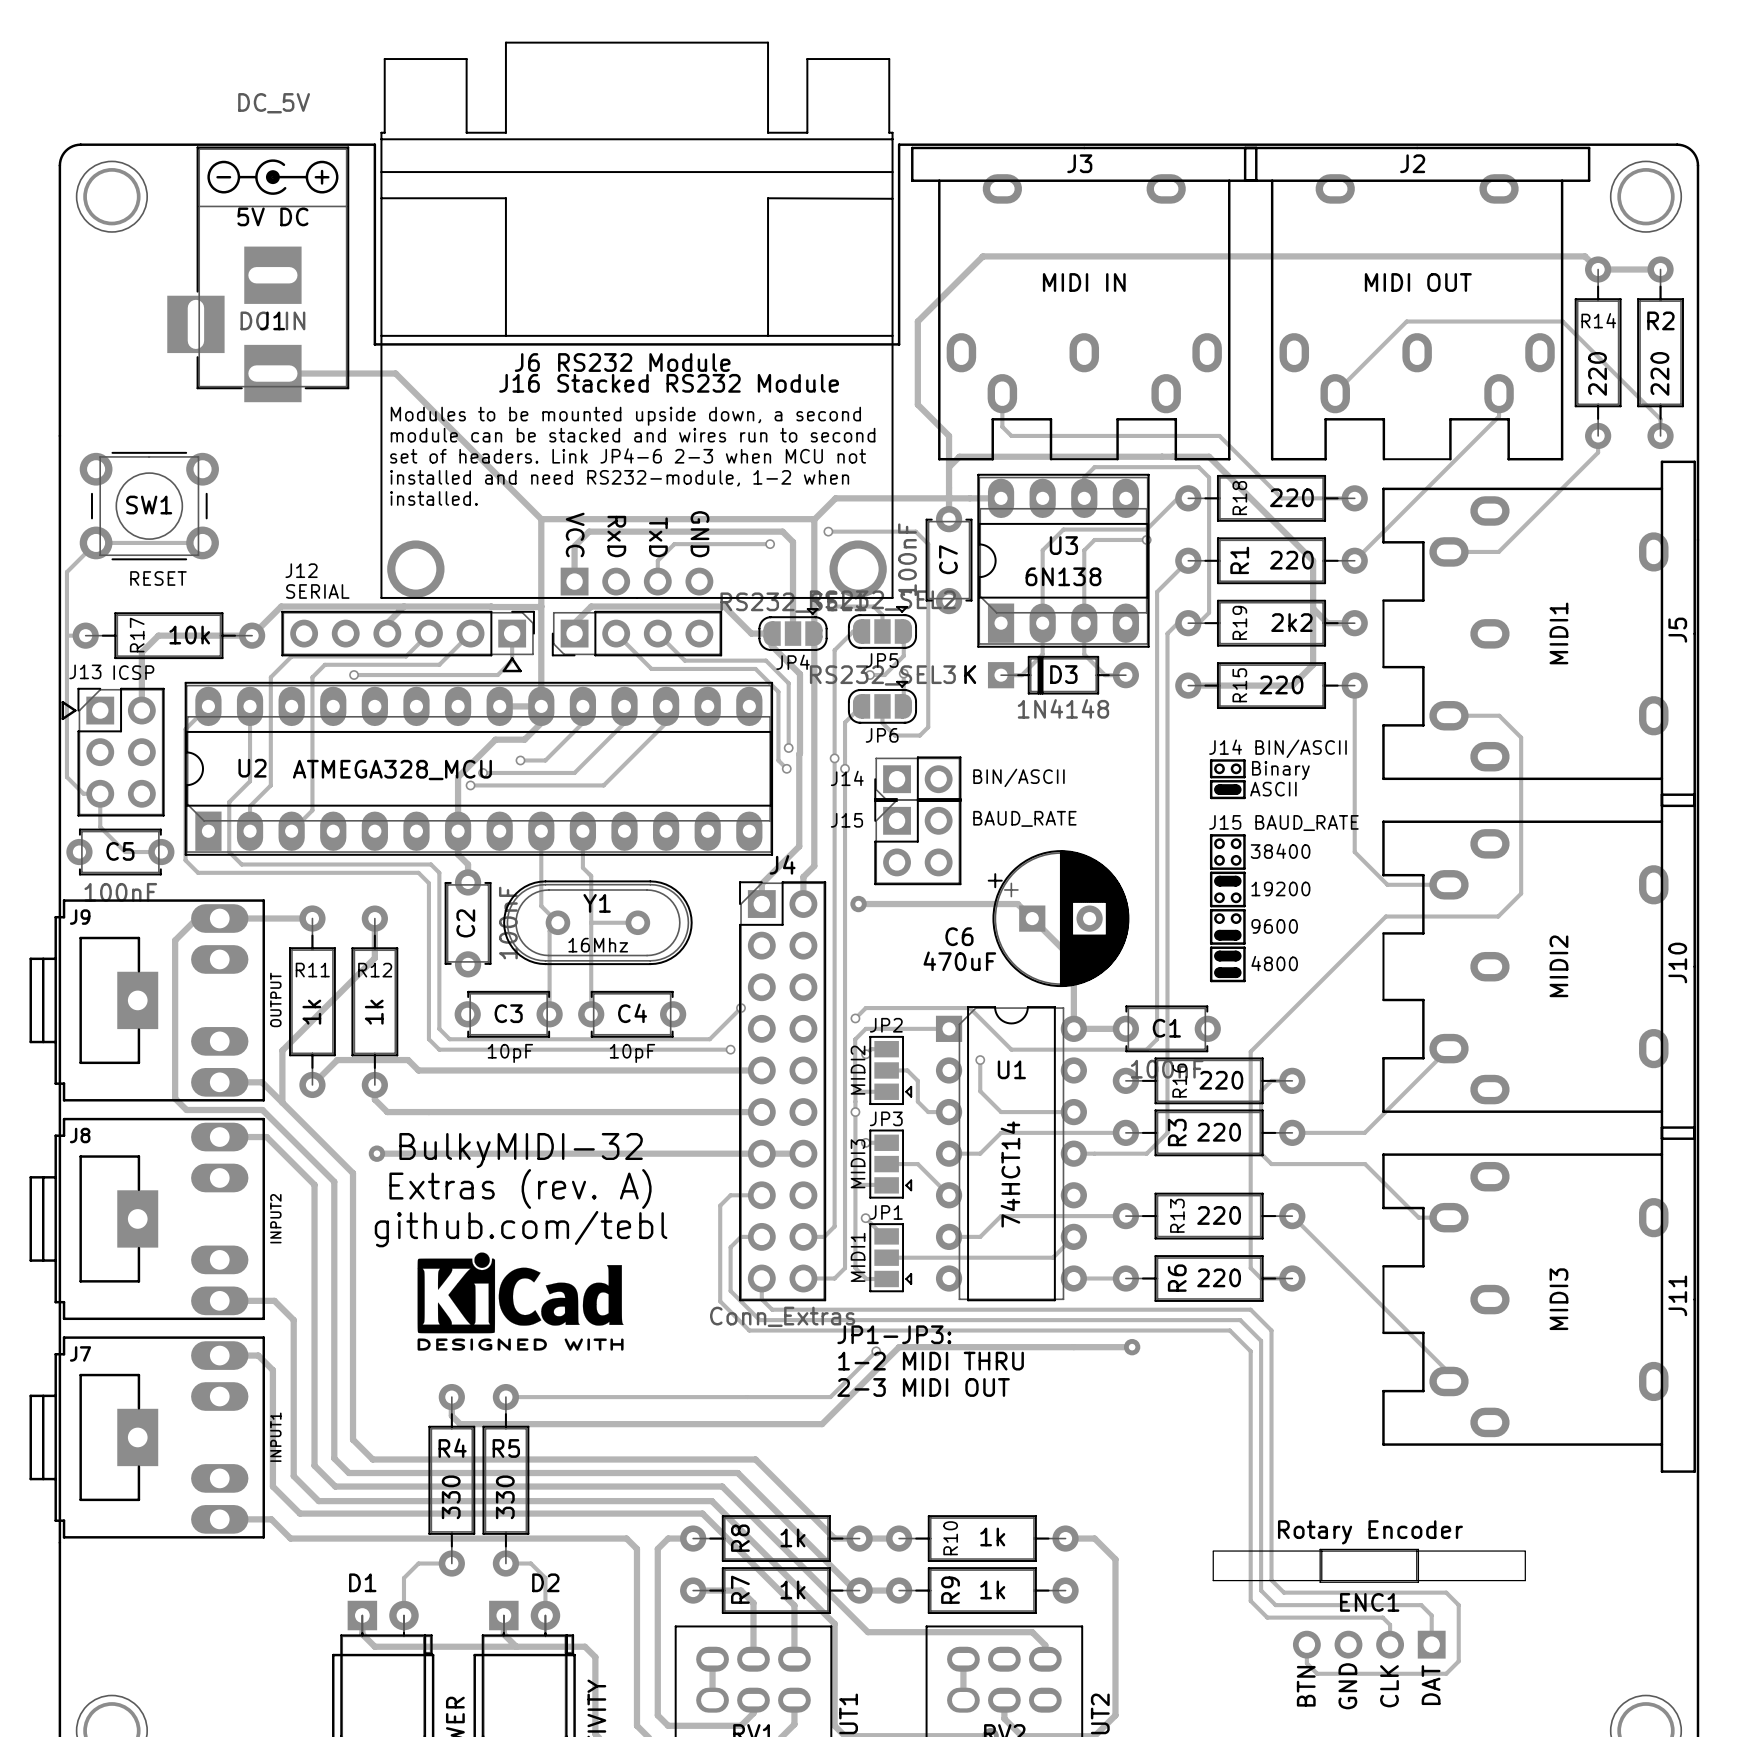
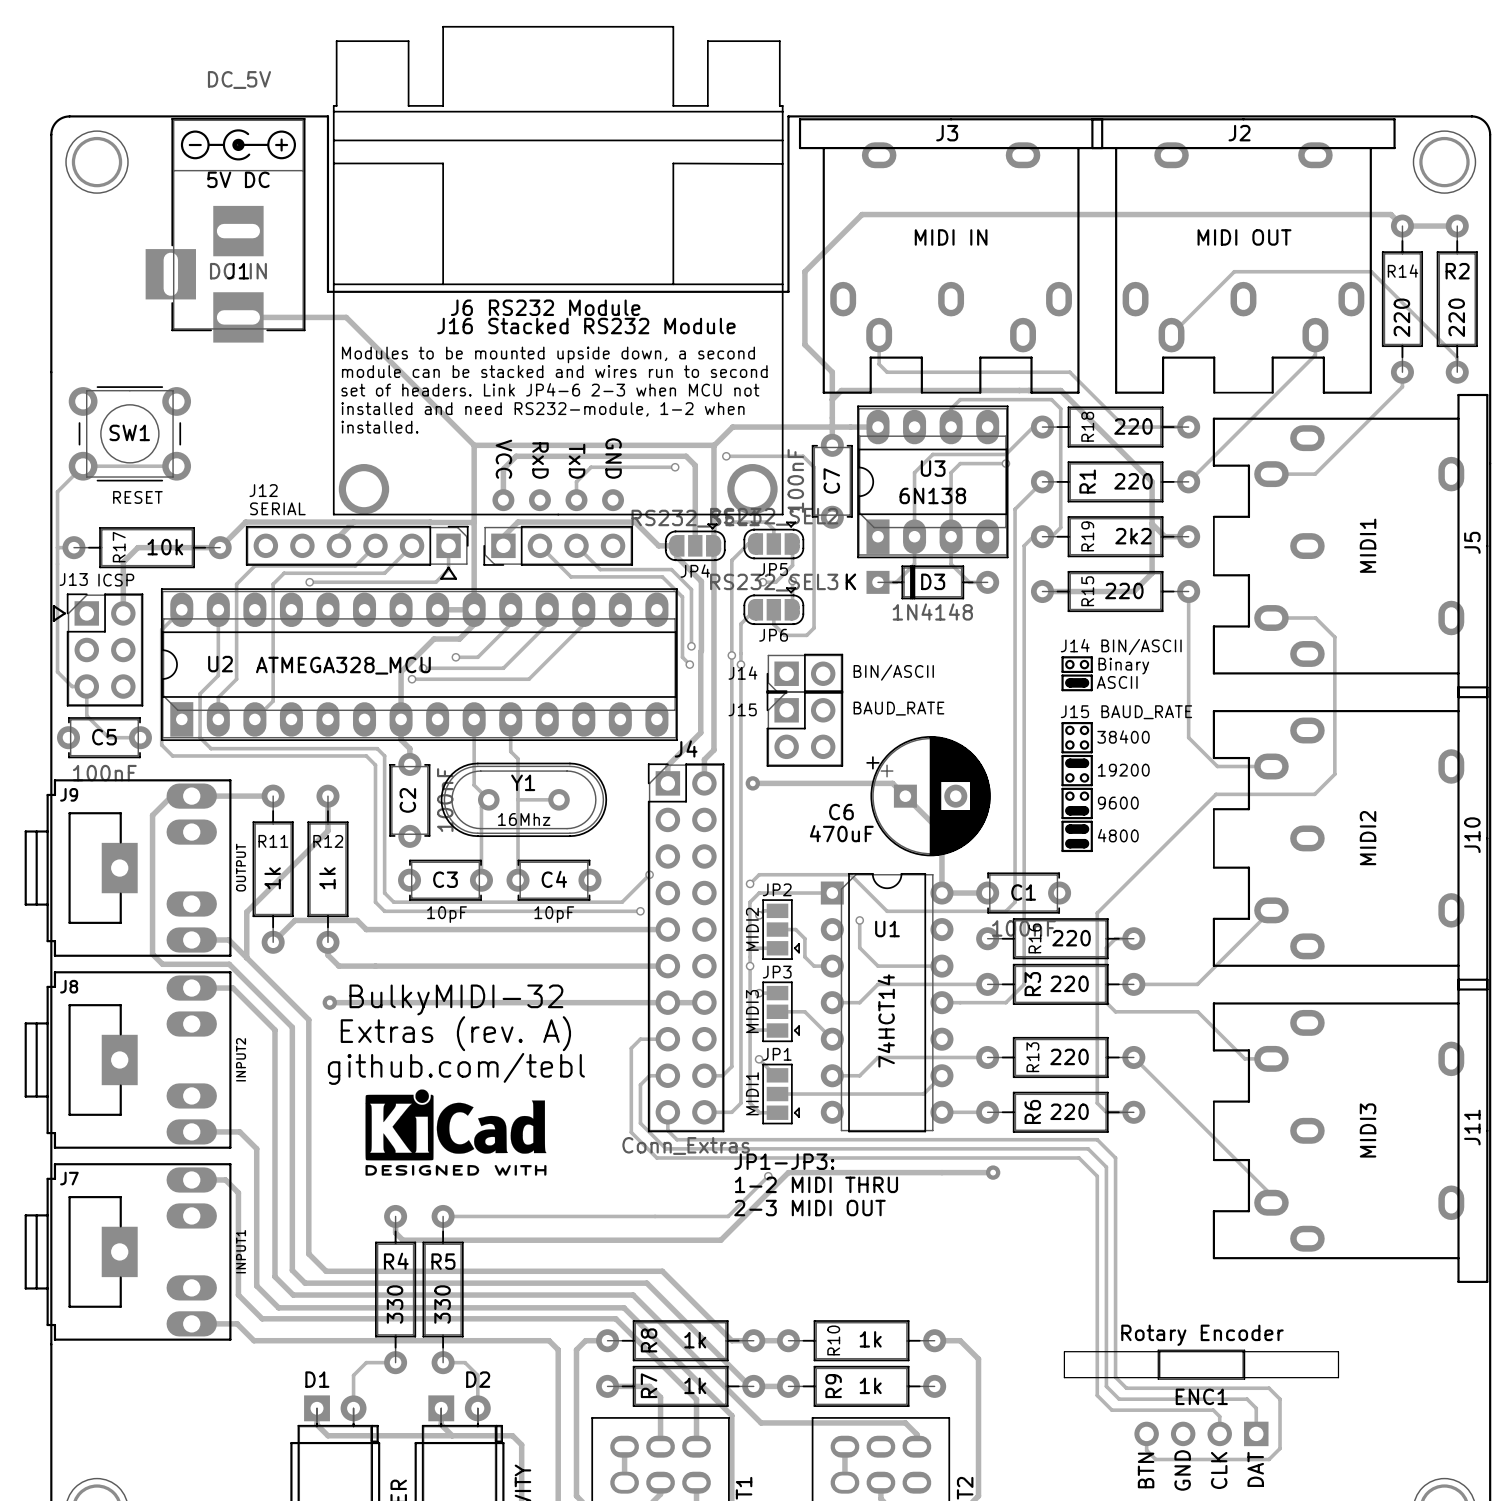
J6 footprint: [380, 41, 894, 599] -> [332, 25, 784, 516]

